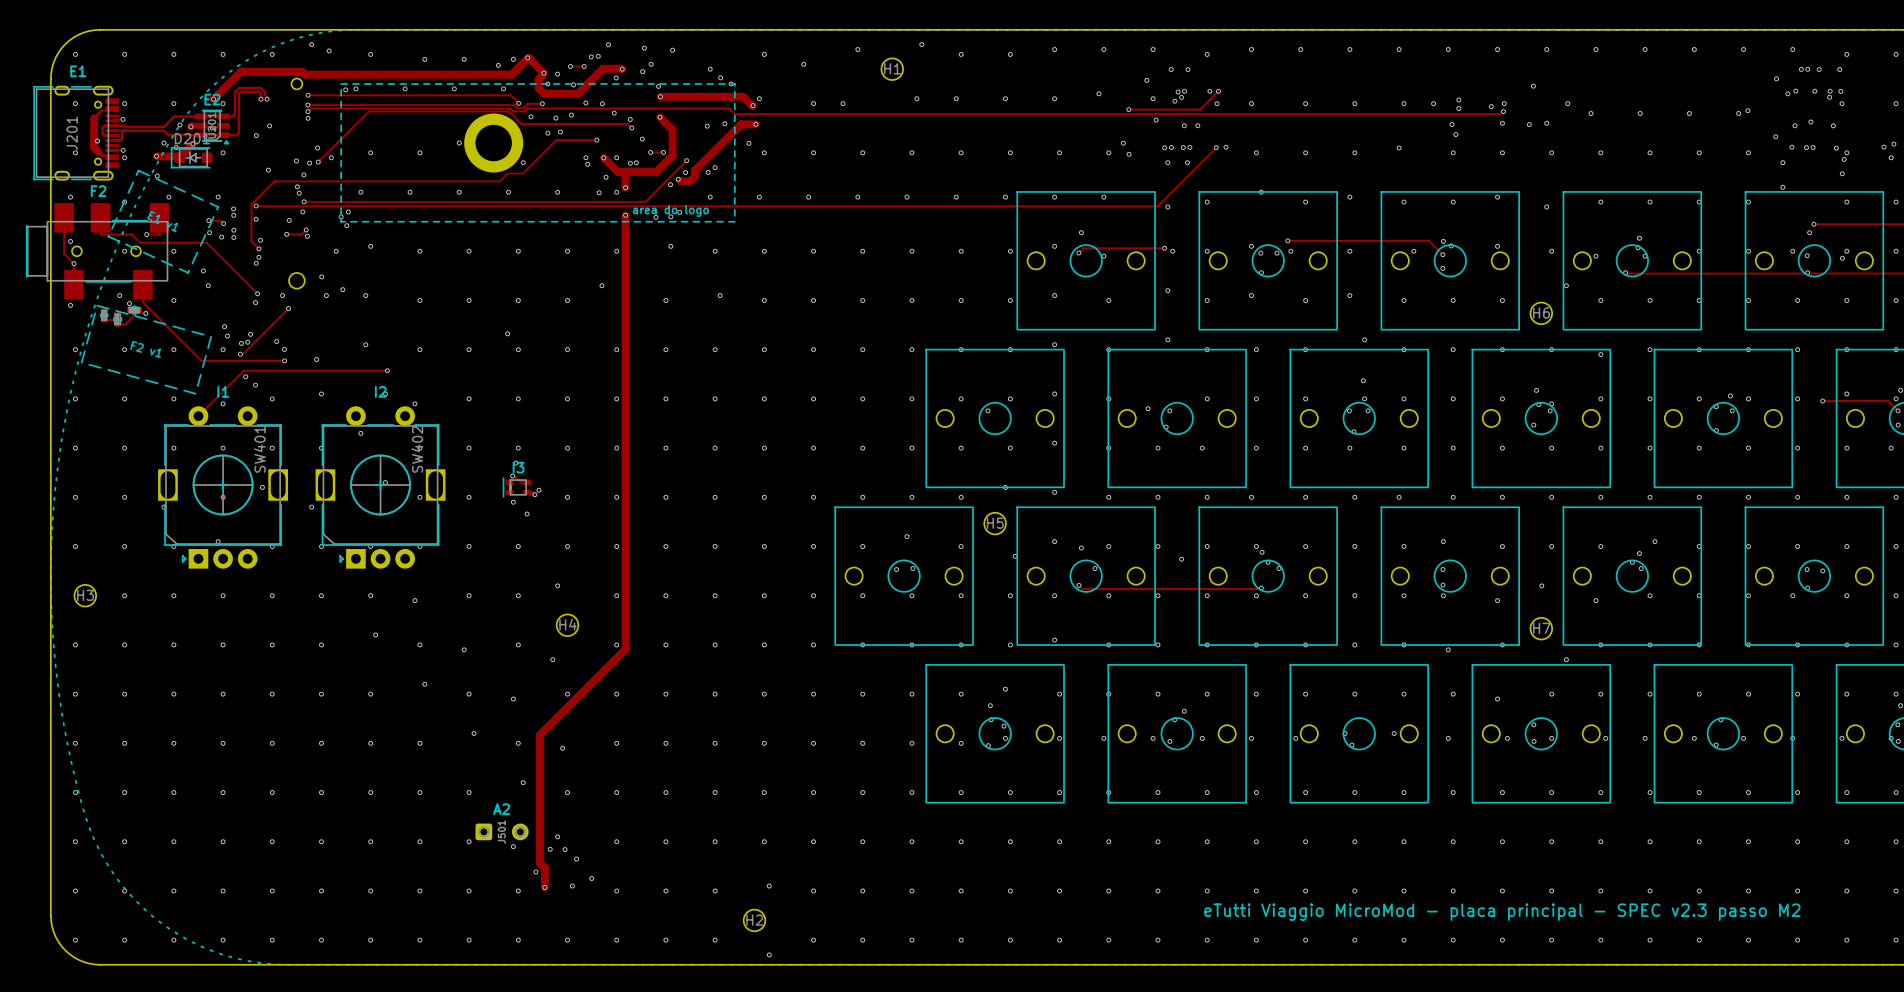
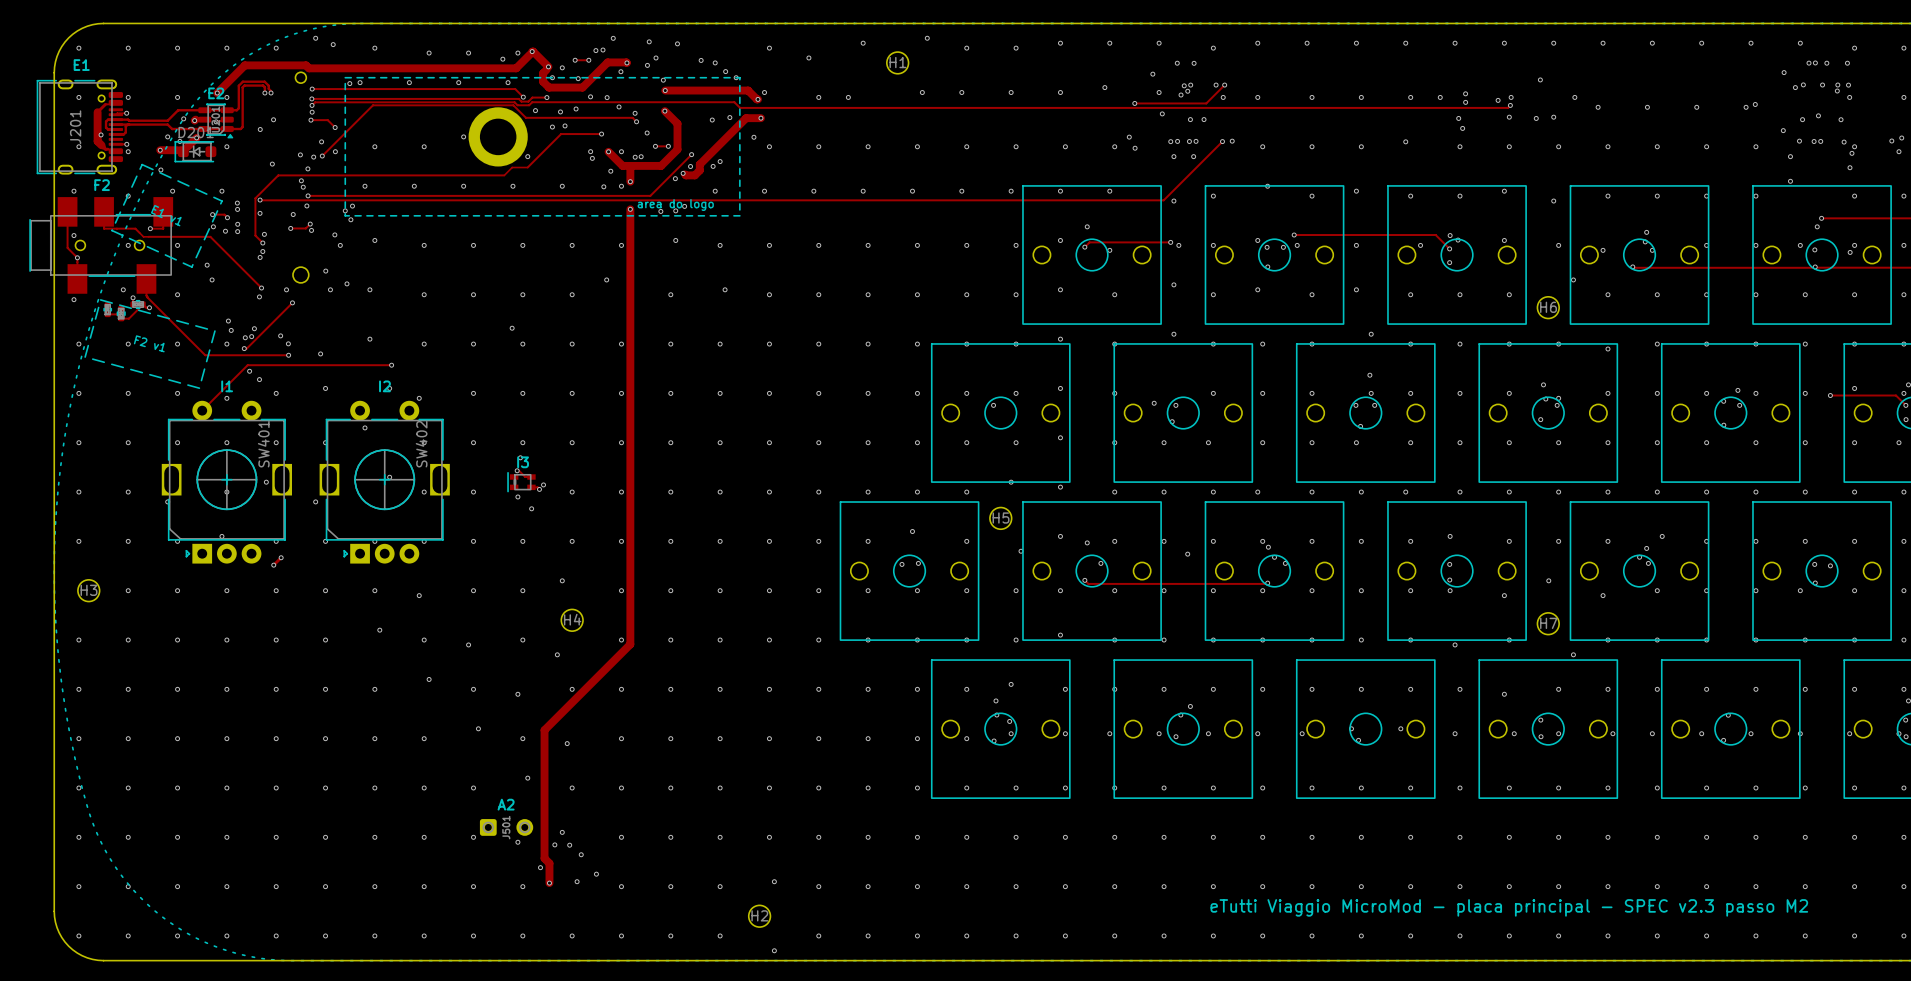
via: none -> (701, 60)
track: none -> (310, 120) (327, 120) (335, 127)
via: none -> (310, 120)
via: none -> (335, 127)
via: none -> (334, 234)
track: none -> (281, 557) (273, 565)
via: none -> (281, 557)
via: none -> (273, 565)

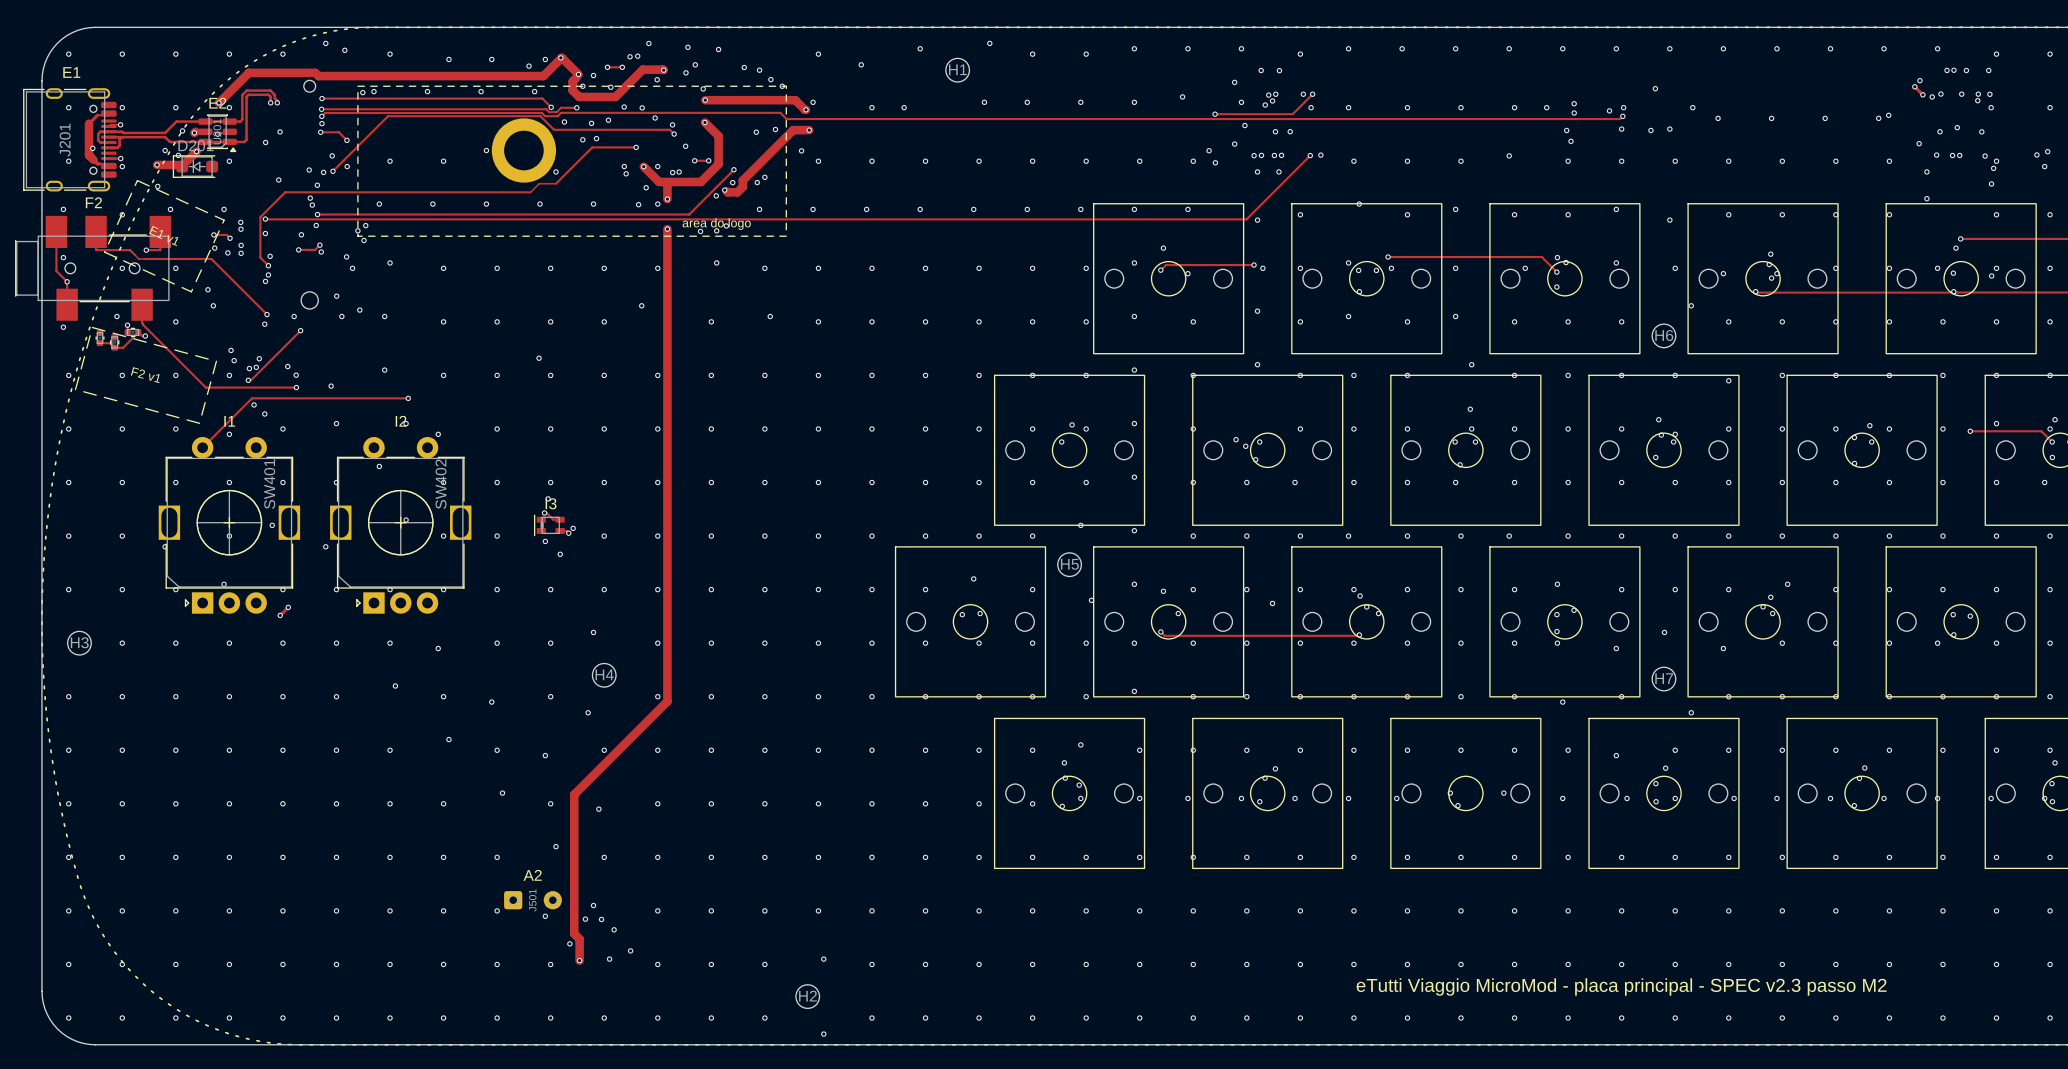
track: none -> (1914, 86) (1922, 94)
via: none -> (1914, 86)
via: none -> (1922, 94)
via: none -> (1234, 144)
via: none -> (1771, 278)
via: none -> (1072, 424)
via: none -> (1245, 446)
via: none -> (1574, 610)
via: none -> (1665, 768)
via: none -> (1864, 767)

